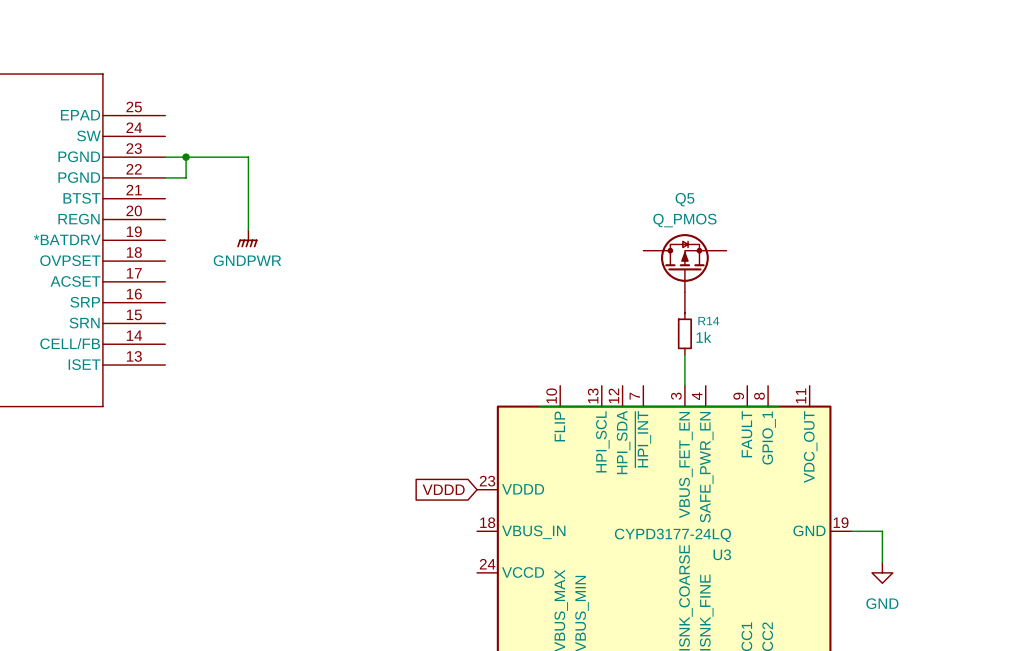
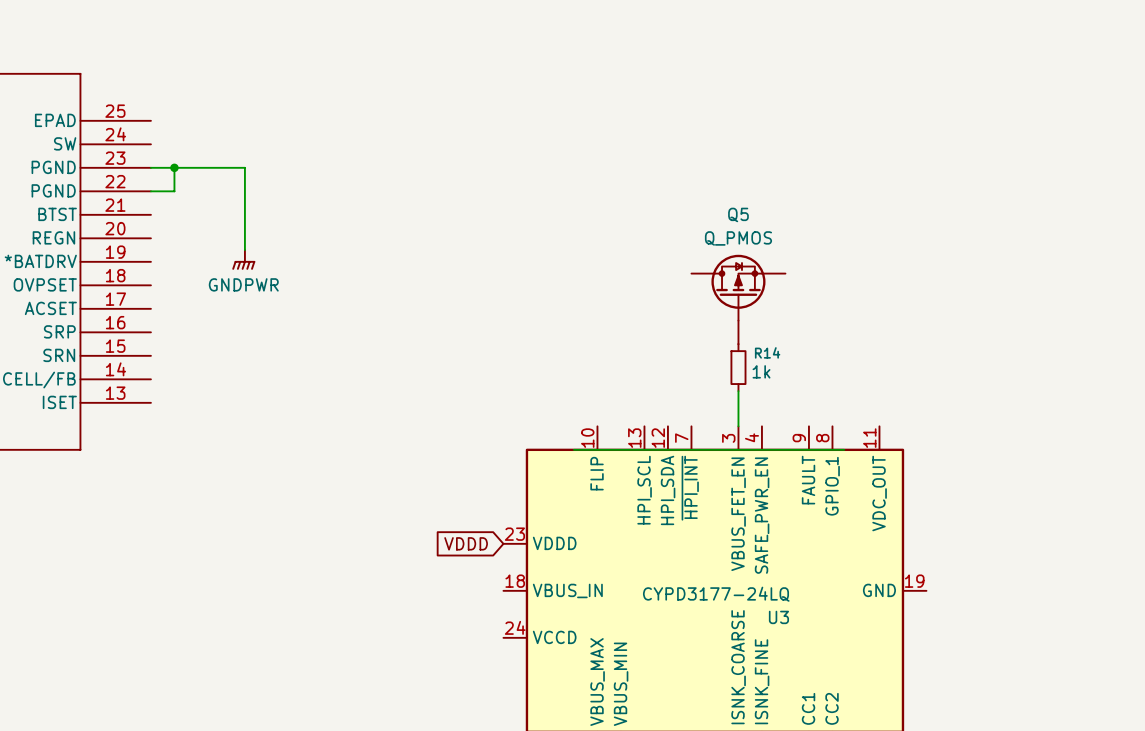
wire: (851, 531) (882, 531) (882, 562) -> none
power symbol: GND (882, 572) -> none

